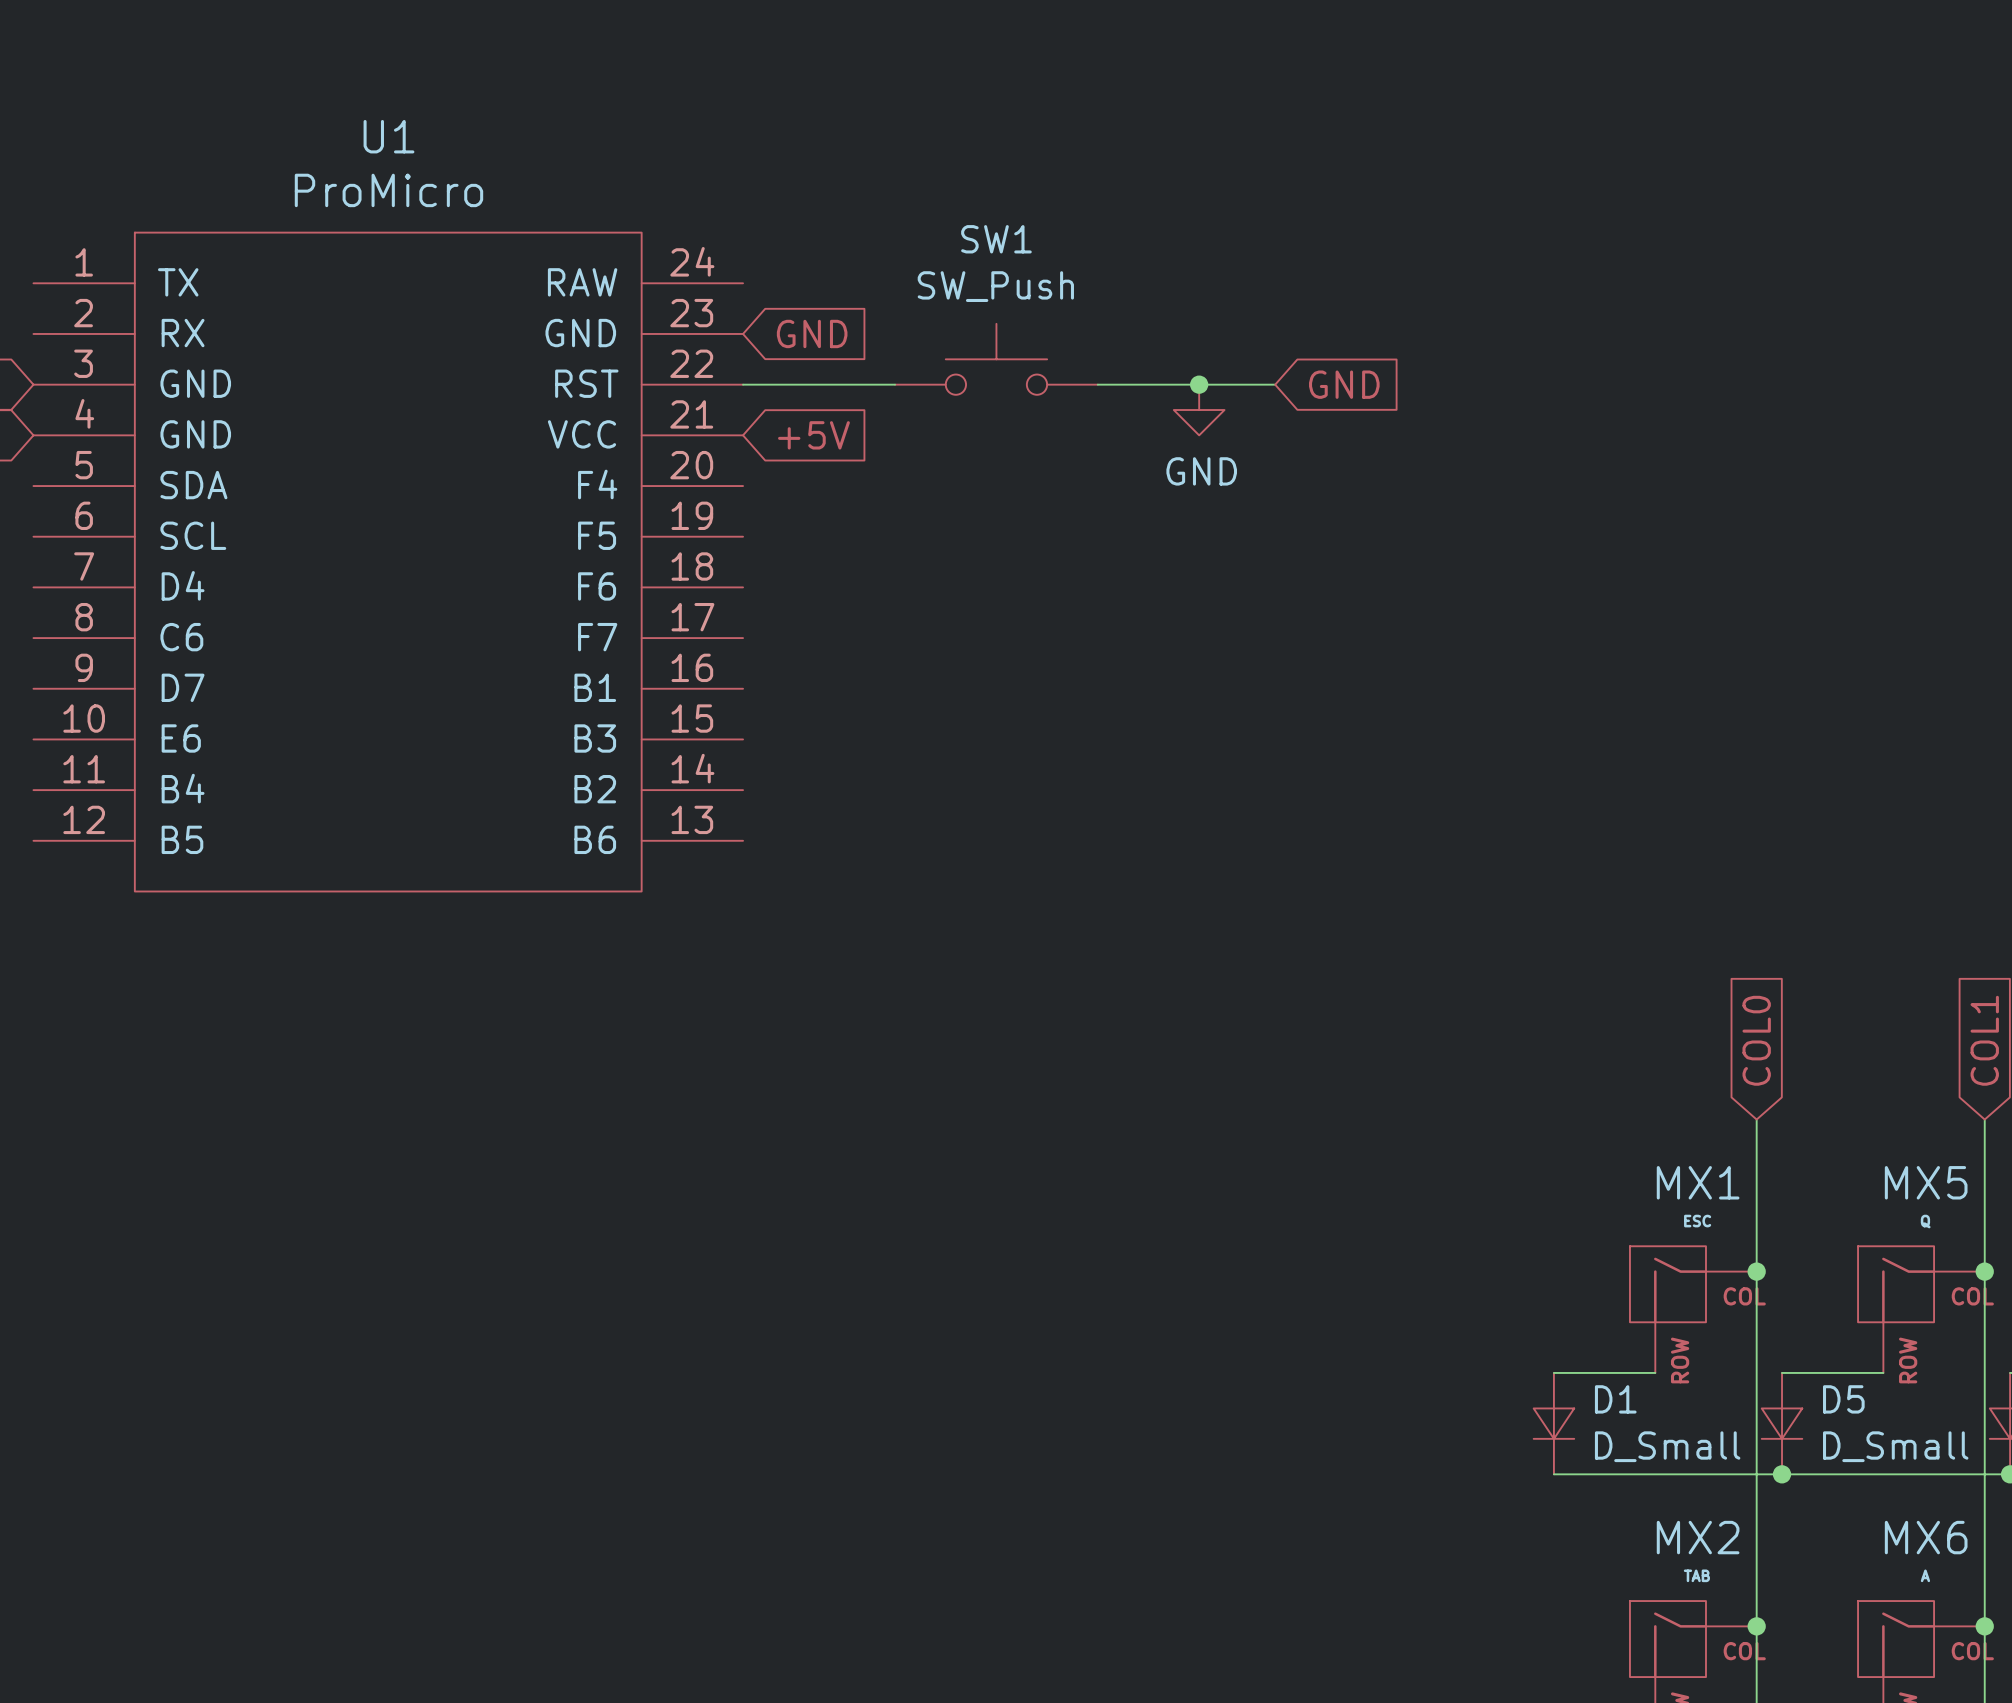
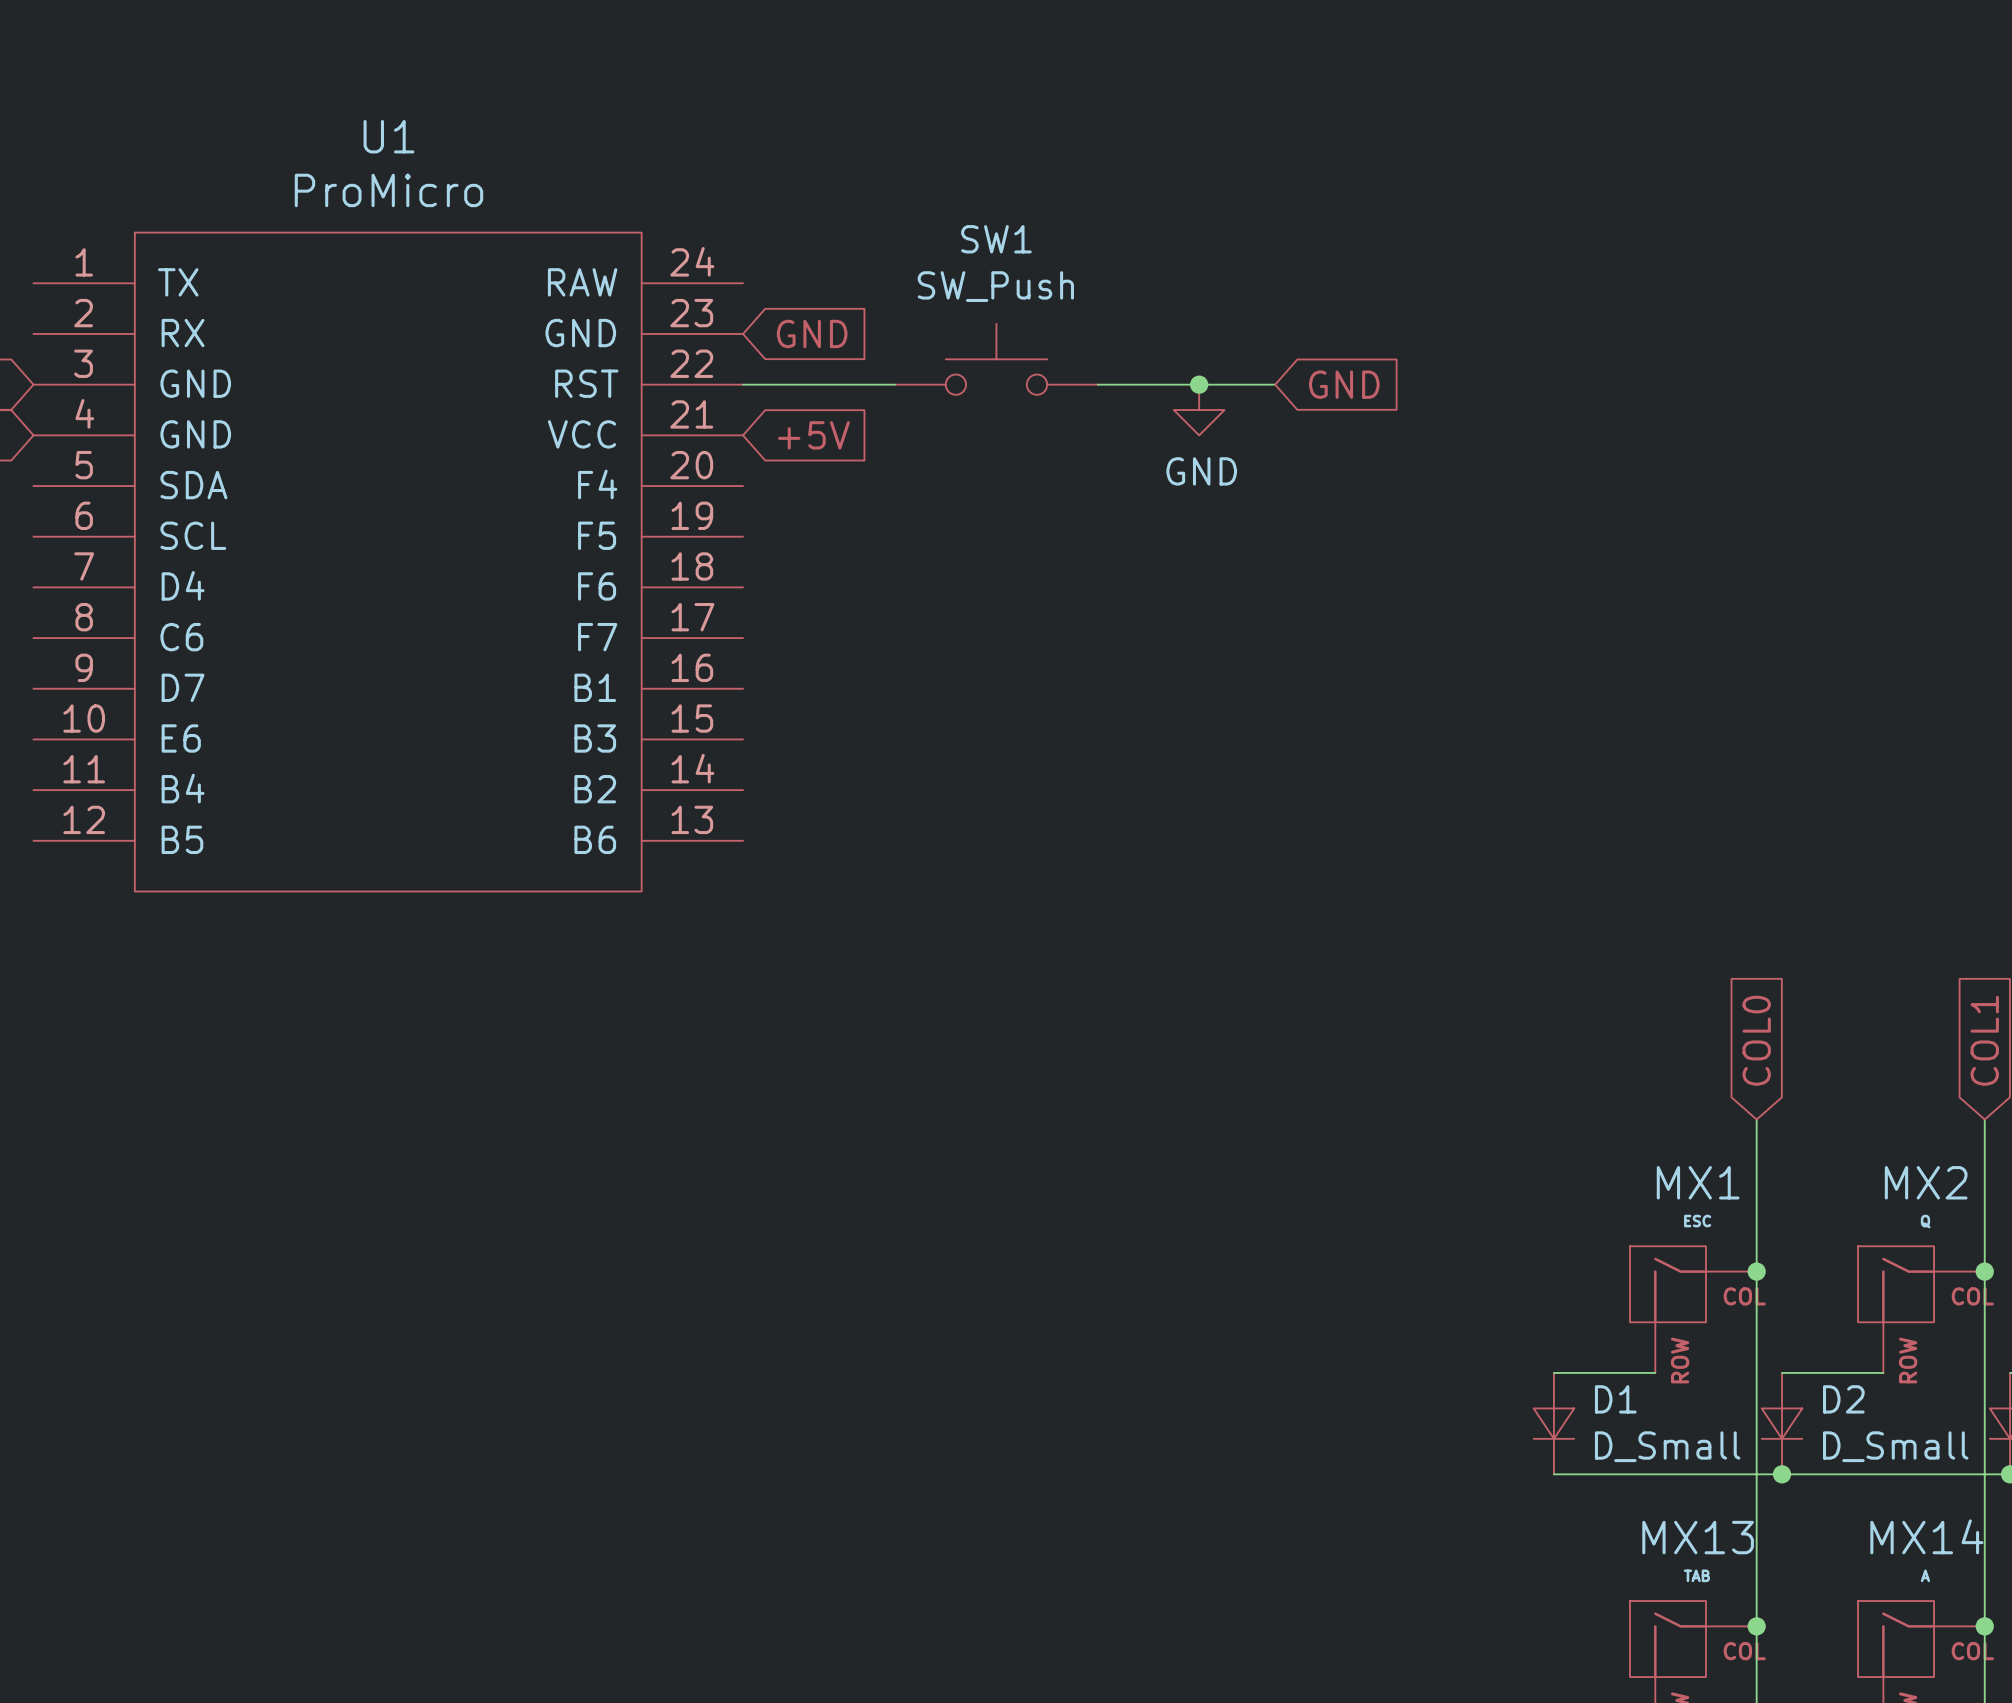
MX5 name: MX5 (1926, 1182) -> MX2 (1926, 1182)
D5 name: D5 (1843, 1399) -> D2 (1843, 1399)
MX2 name: MX2 (1698, 1537) -> MX13 (1698, 1537)
MX6 name: MX6 (1926, 1537) -> MX14 (1926, 1536)

